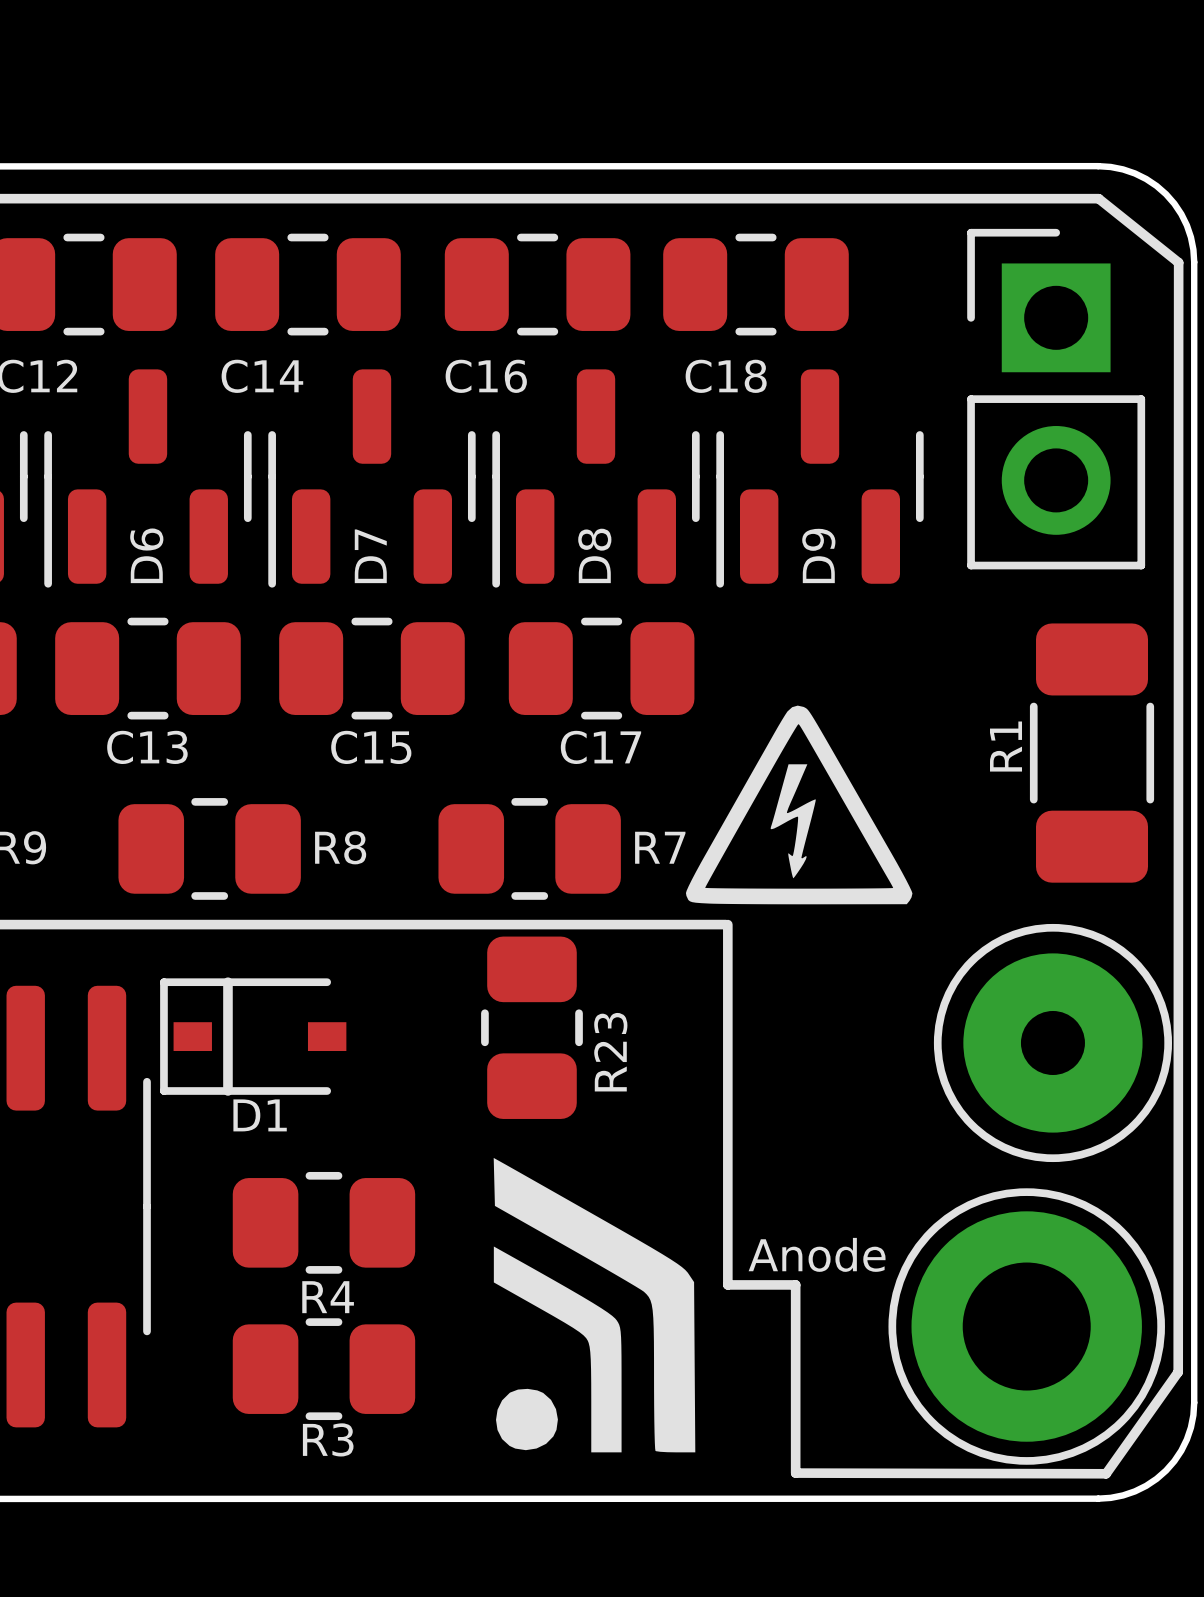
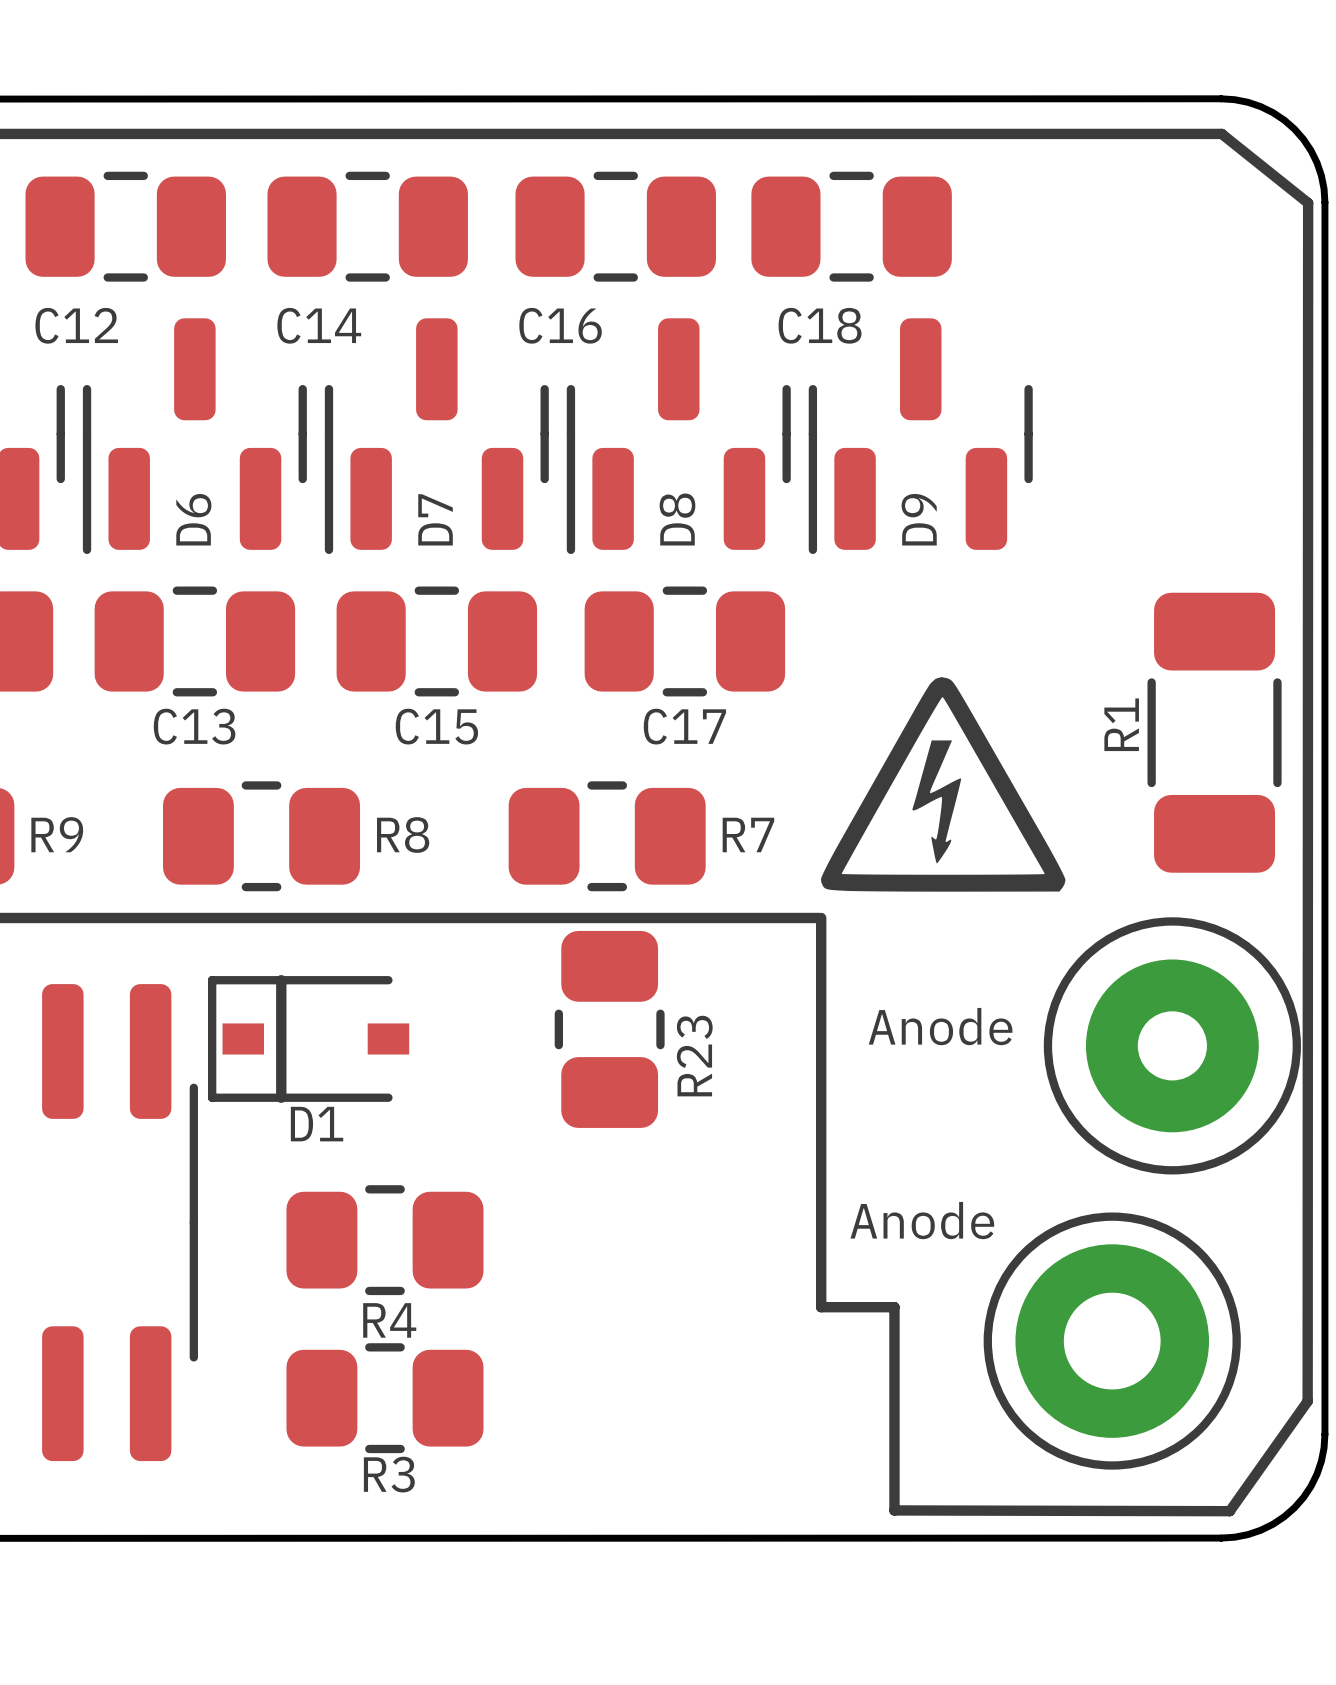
part: (1056, 399) -> none
drawing position: (799, 804) -> (943, 784)
part footprint: [933, 923, 1173, 1163] -> [1043, 917, 1301, 1175]
part value: none -> Anode (940, 1026)
drawing: [493, 1157, 696, 1453] -> none
part footprint: [888, 1188, 1165, 1465] -> [983, 1212, 1241, 1470]
part value position: Anode (817, 1254) -> Anode (922, 1220)

